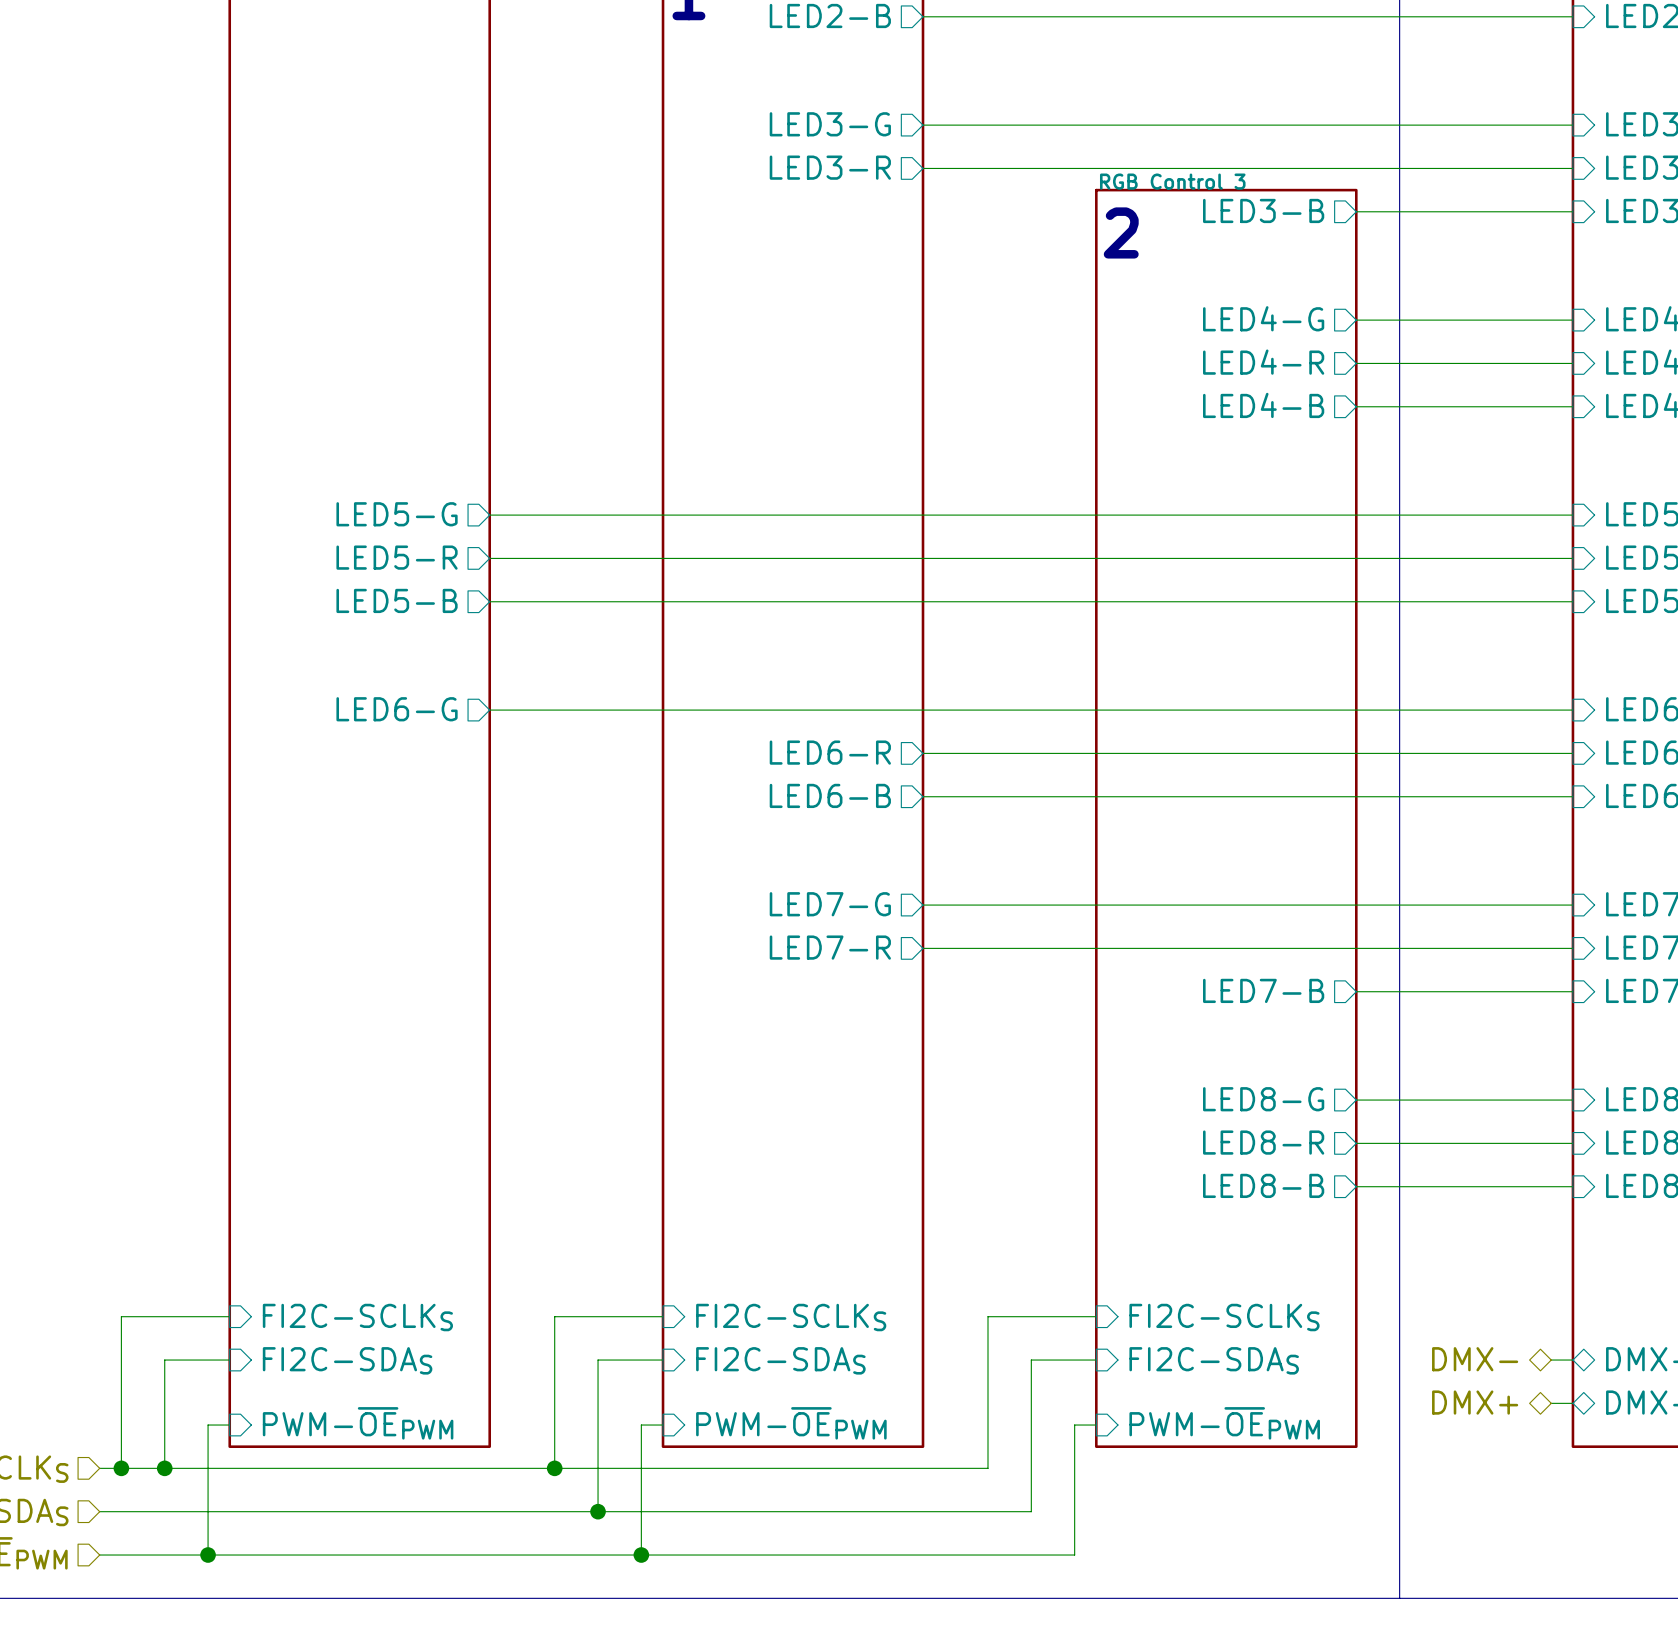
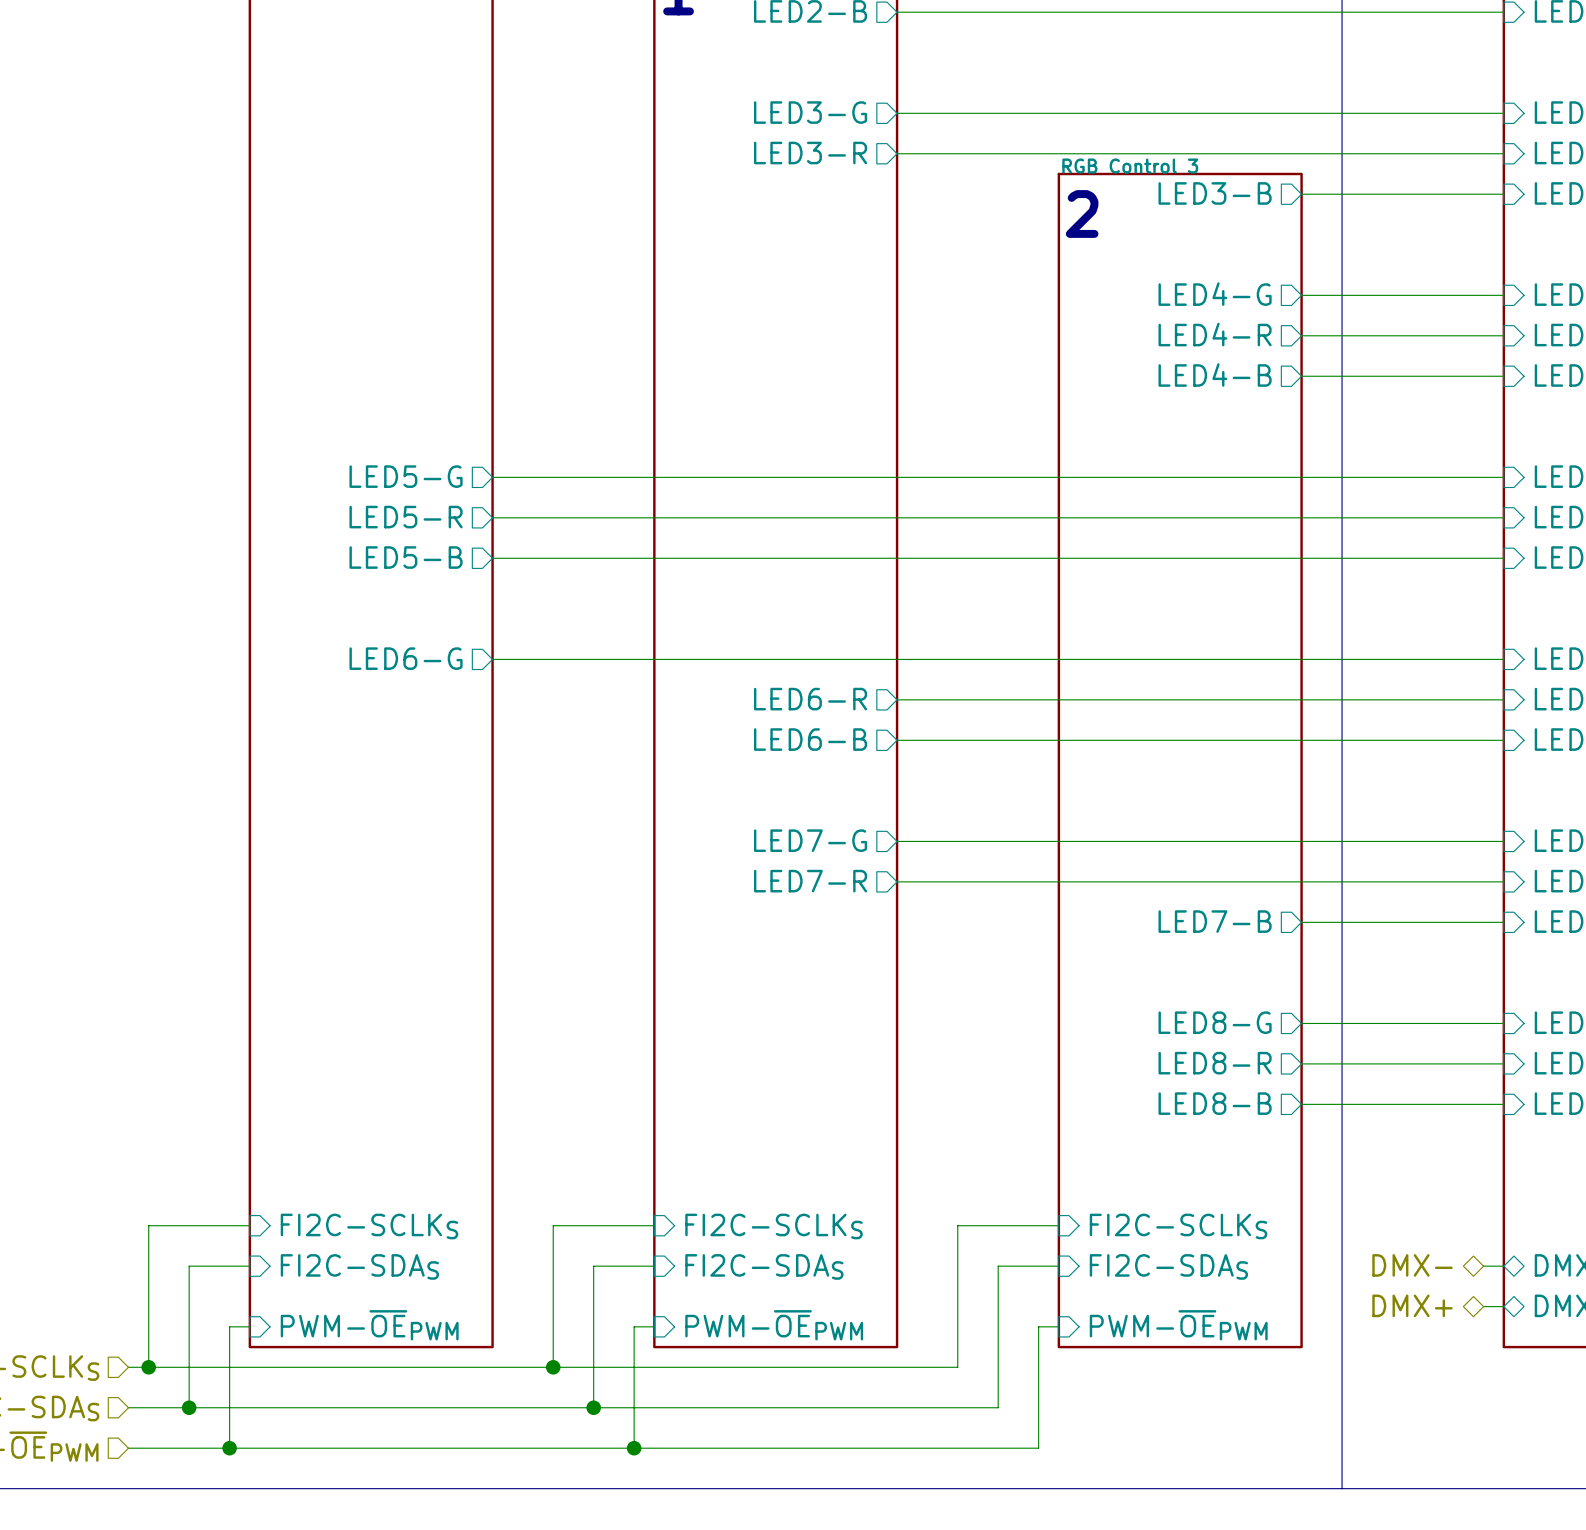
wire: none -> (189, 1367) (189, 1407)
junction position: (164, 1468) -> (189, 1407)

